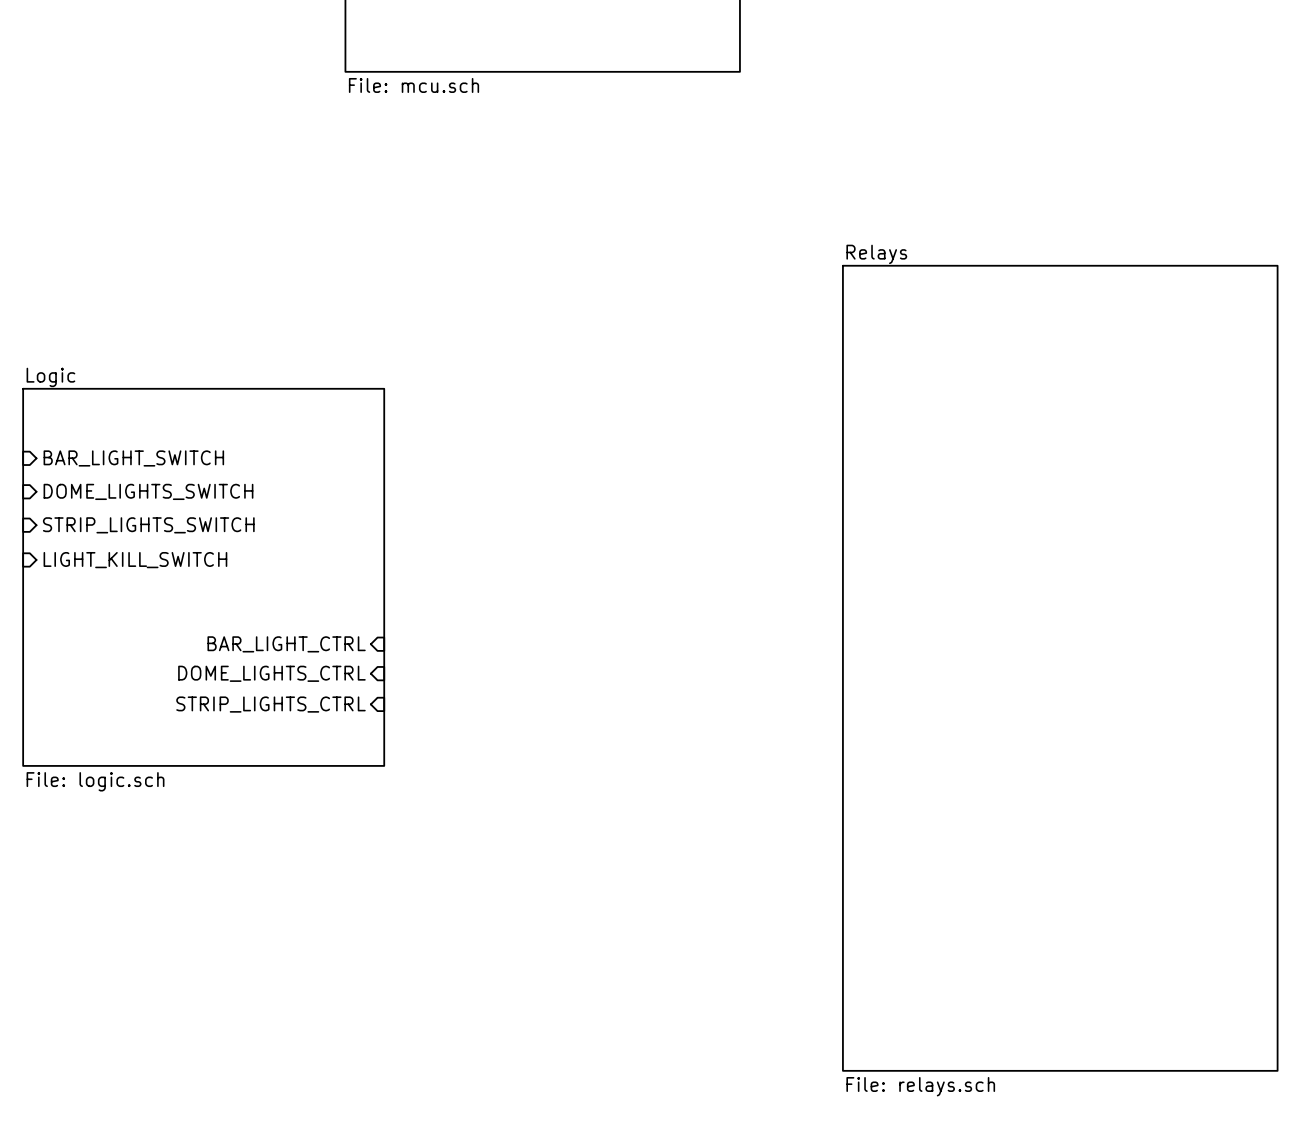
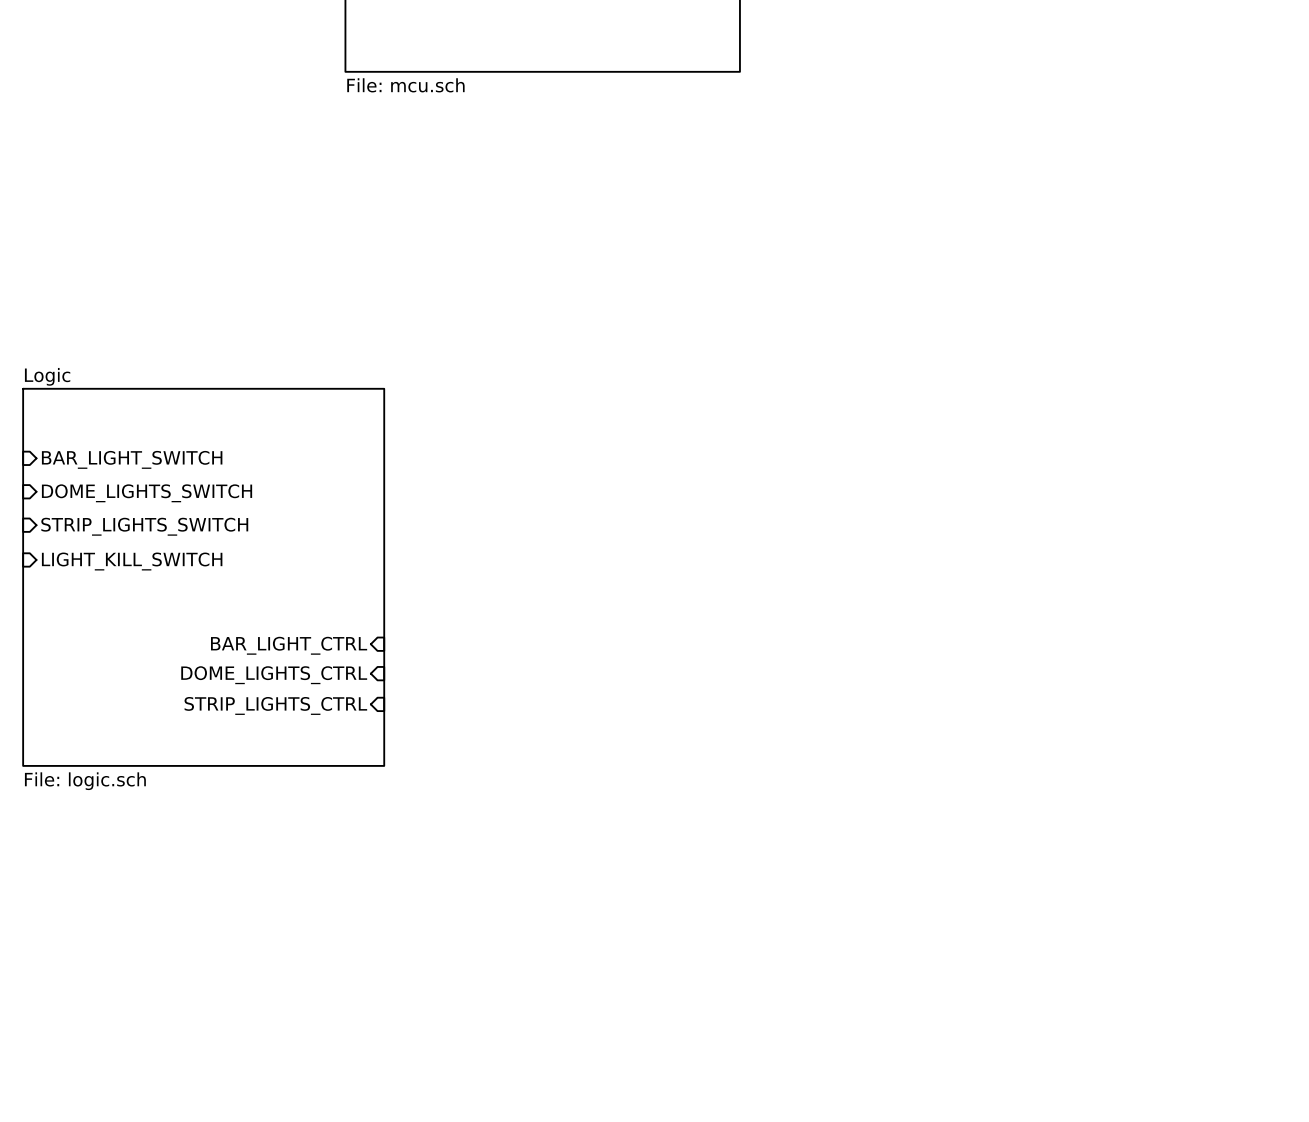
sheet Relays: File: relays.sch (1060, 668) -> none

